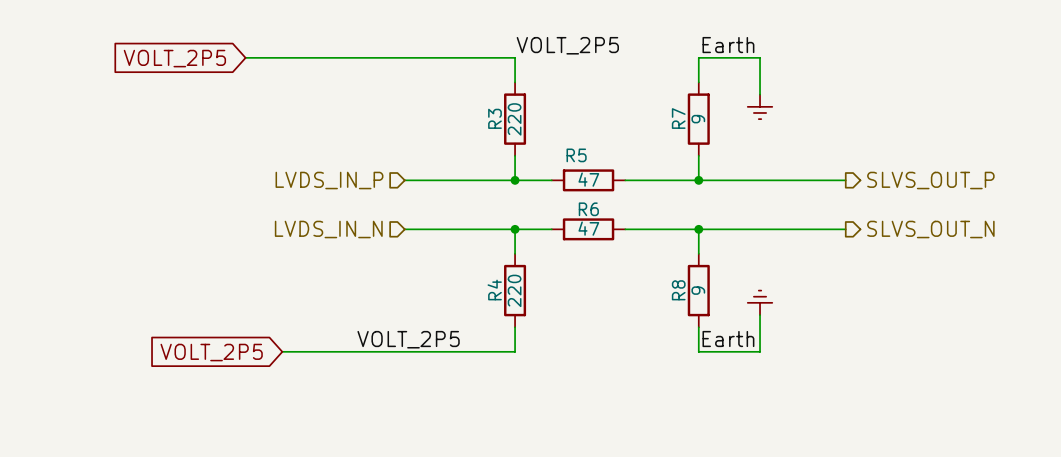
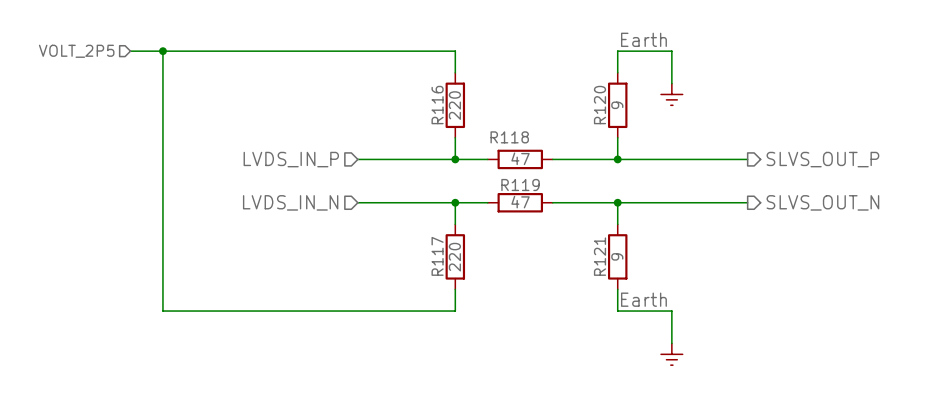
label: VOLT_2P5 (567, 45) -> none
wire: none -> (130, 51) (217, 51)
wire: none -> (162, 51) (162, 311) (249, 311)
junction: none -> (162, 51)
hierarchical label: none -> VOLT_2P5 (76, 51)
global label: VOLT_2P5 (174, 58) -> none
R3 name: R3 (494, 118) -> R116 (437, 105)
R7 name: R7 (678, 118) -> R120 (599, 105)
R5 name: R5 (576, 155) -> R118 (509, 137)
R6 name: R6 (588, 209) -> R119 (520, 185)
R4 name: R4 (494, 290) -> R117 (437, 256)
R8 name: R8 (678, 290) -> R121 (599, 256)
power symbol rotation: 0° (760, 302) -> 180° (671, 354)
power symbol position: (760, 302) -> (671, 354)
wire: (760, 315) (760, 351) -> (671, 343) (671, 311)
label: VOLT_2P5 (408, 339) -> none
global label: VOLT_2P5 (211, 352) -> none

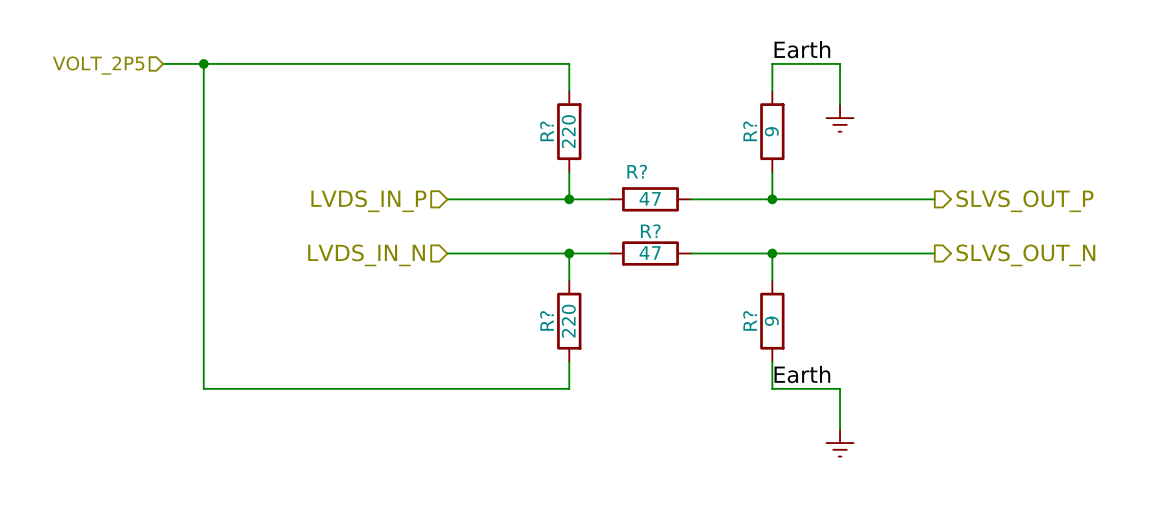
R116 name: R116 (437, 105) -> R? (546, 131)
R120 name: R120 (599, 105) -> R? (750, 131)
R118 name: R118 (509, 137) -> R? (637, 171)
R119 name: R119 (520, 185) -> R? (650, 231)
R117 name: R117 (437, 256) -> R? (546, 320)
R121 name: R121 (599, 256) -> R? (750, 320)

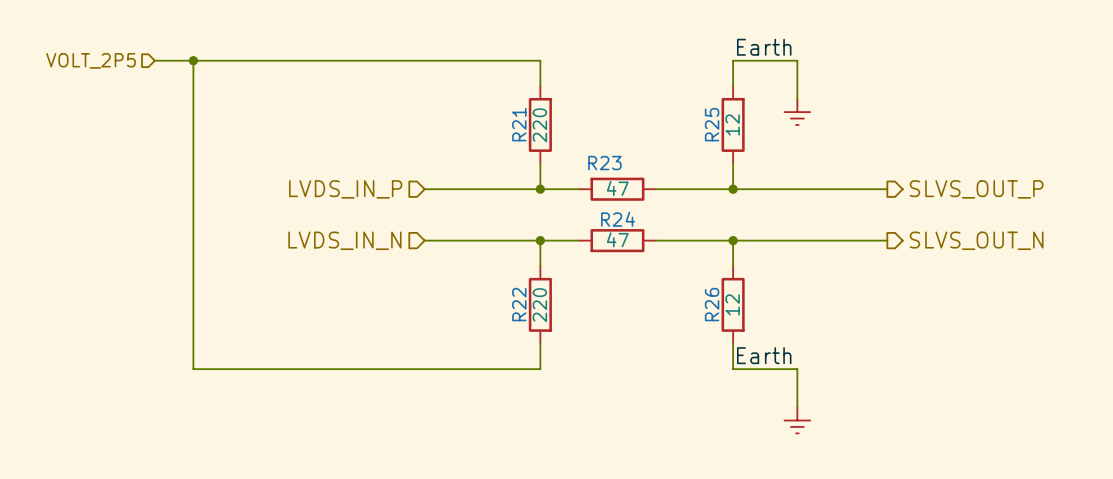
R? name: R? (546, 131) -> R21 (519, 124)
R? name: R? (750, 131) -> R25 (712, 124)
R? value: 9 (771, 131) -> 12 (732, 124)
R? name: R? (637, 171) -> R23 (604, 163)
R? name: R? (650, 231) -> R24 (618, 219)
R? name: R? (546, 320) -> R22 (519, 304)
R? name: R? (750, 320) -> R26 (712, 304)
R? value: 9 (771, 321) -> 12 (732, 304)

